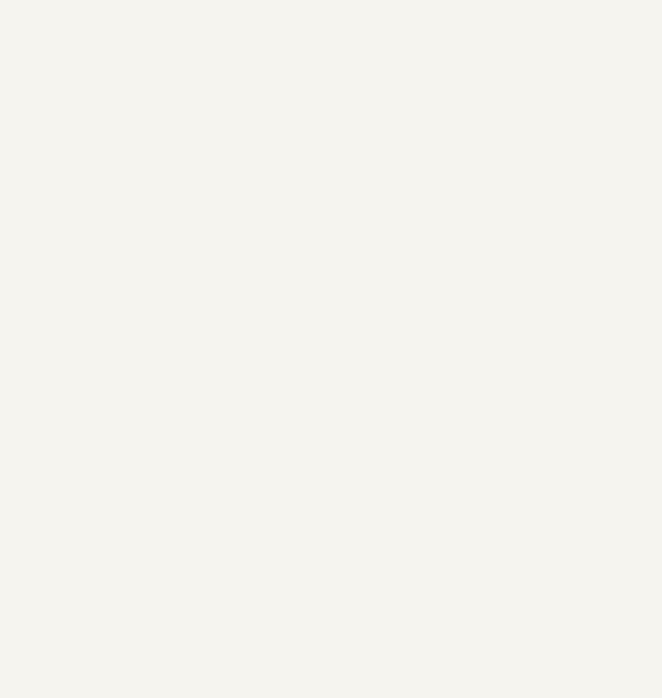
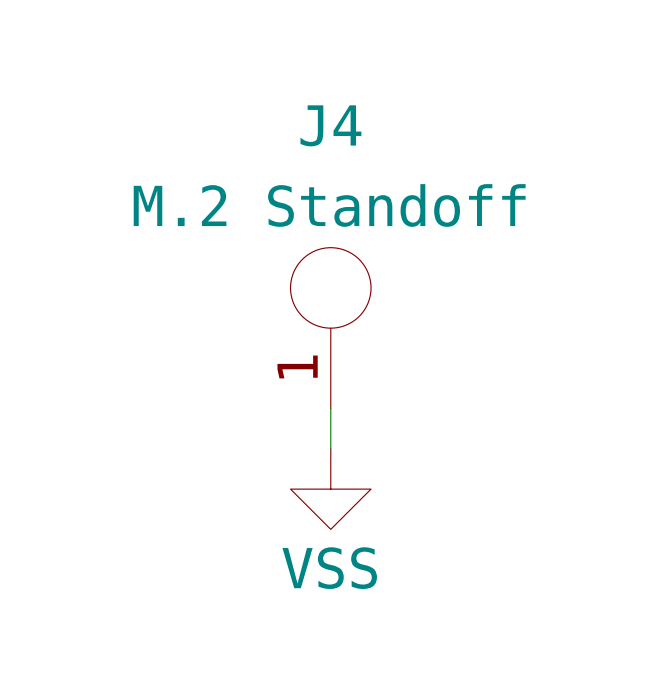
J4: none -> M.2 Standoff (330, 328)
wire: none -> (330, 408) (330, 448)
power symbol: none -> VSS (330, 489)

